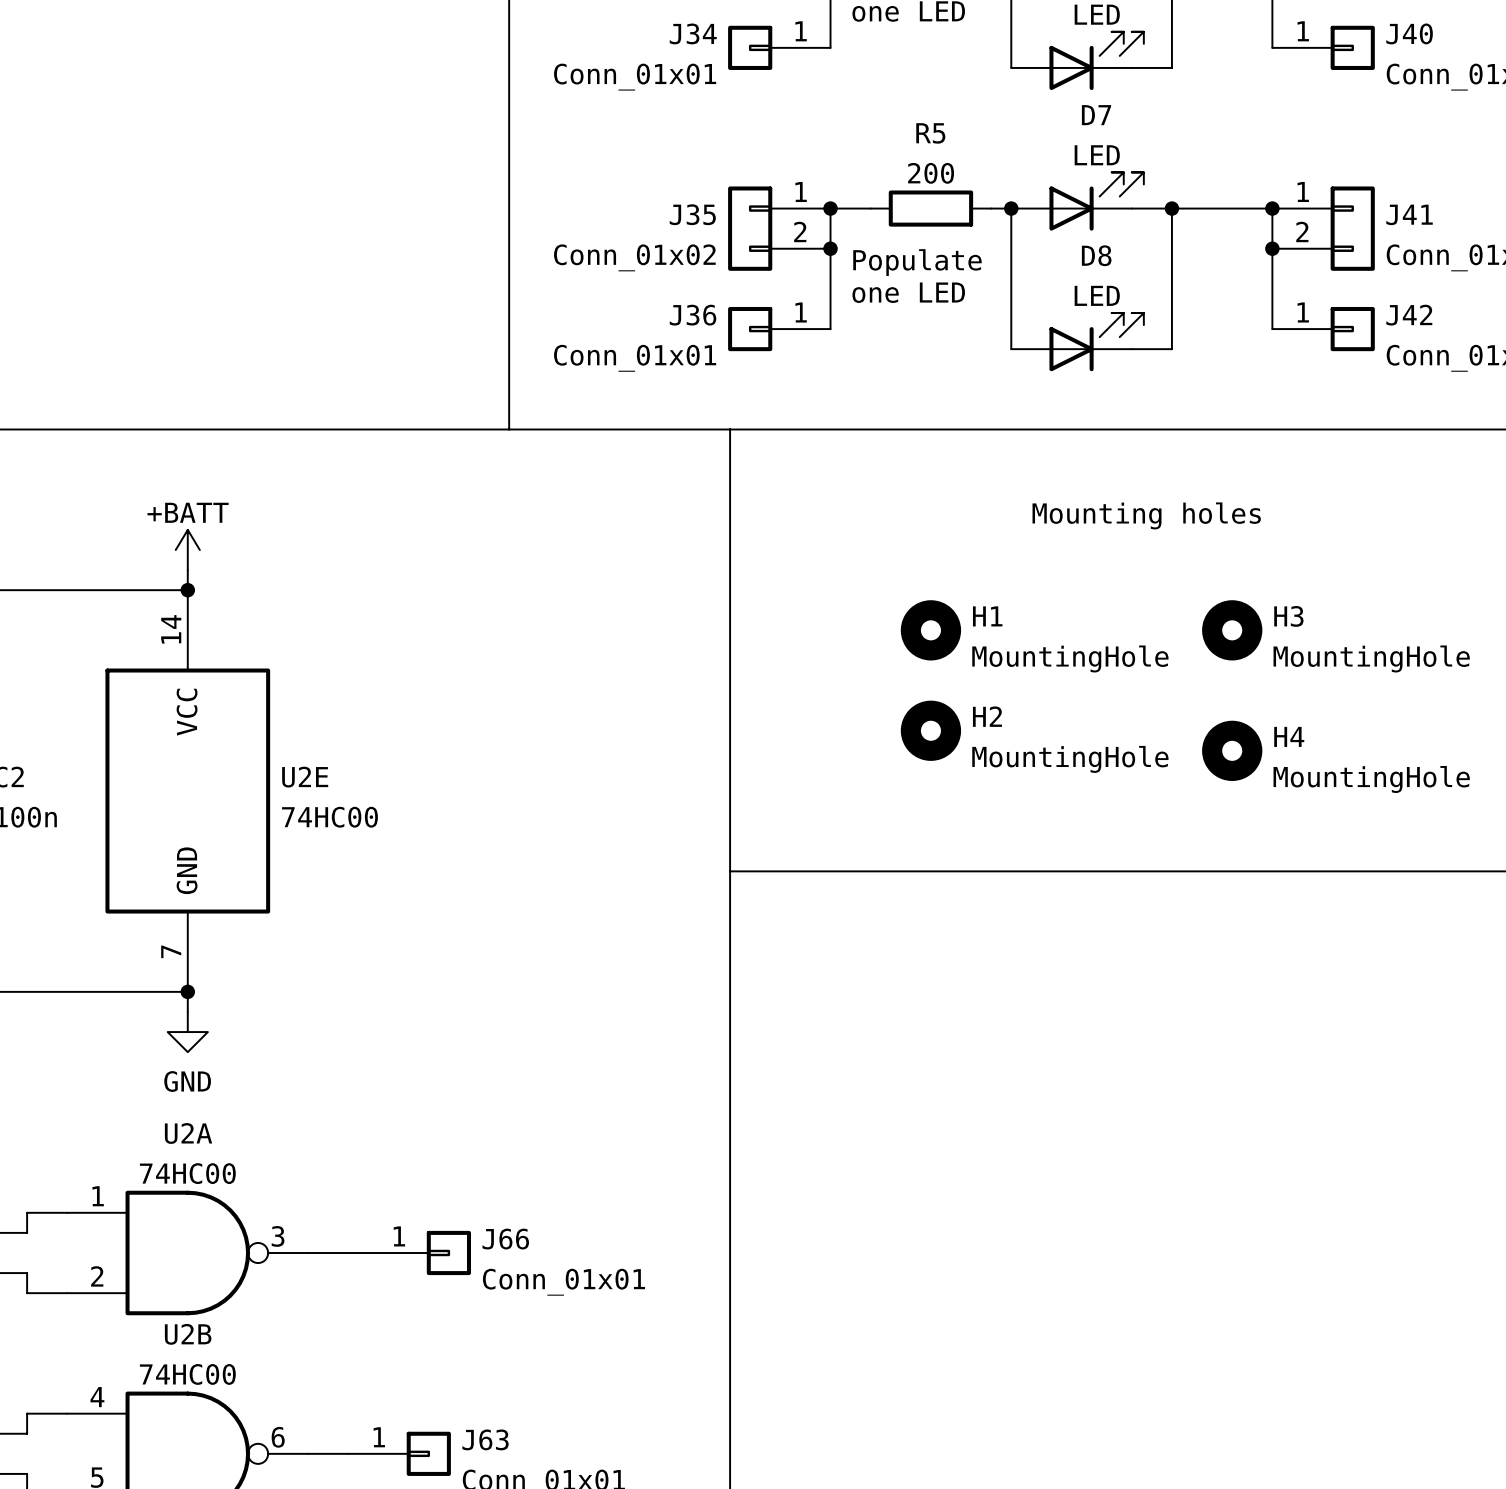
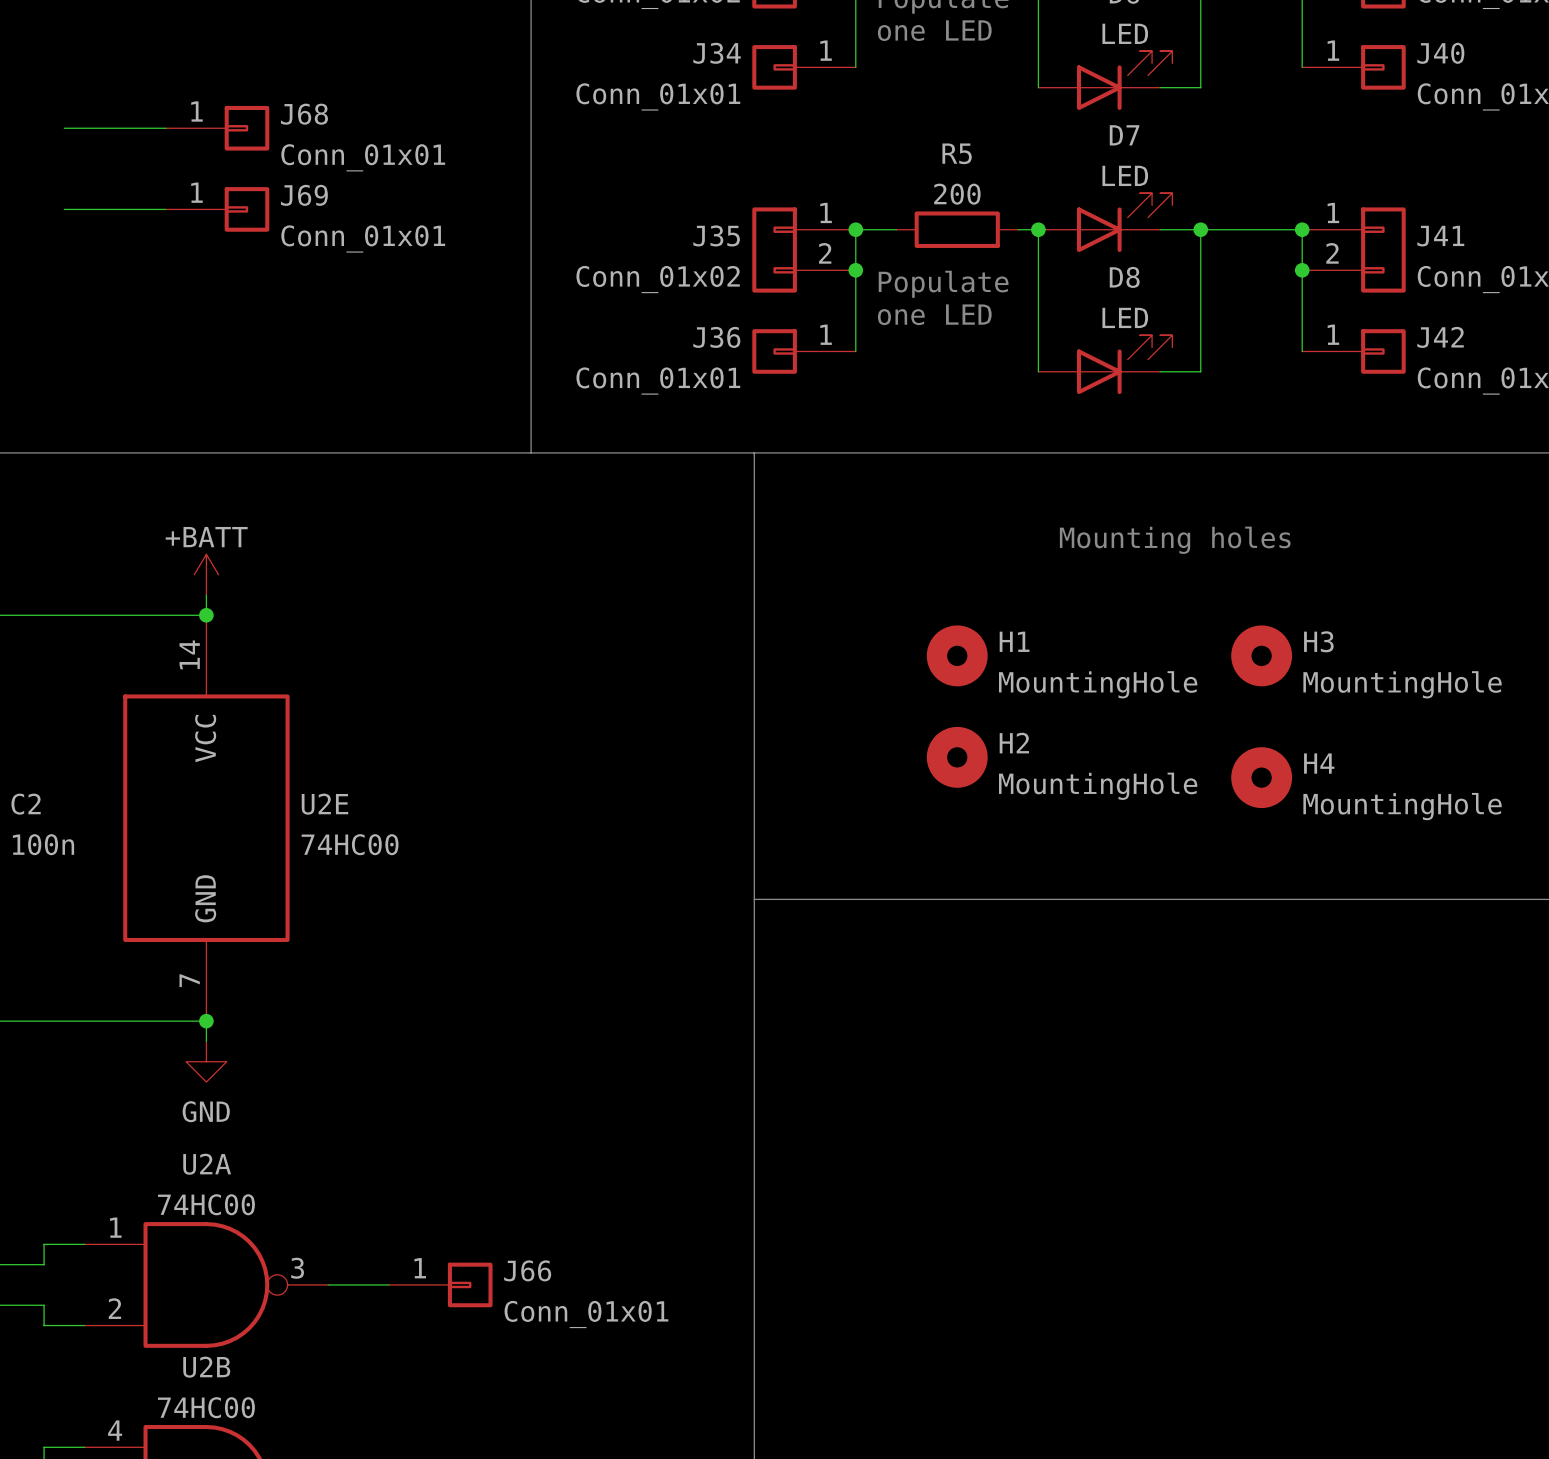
wire: none -> (64, 128) (165, 128)
J68: none -> Conn_01x01 (217, 128)
wire: none -> (64, 209) (165, 209)
J69: none -> Conn_01x01 (217, 209)

